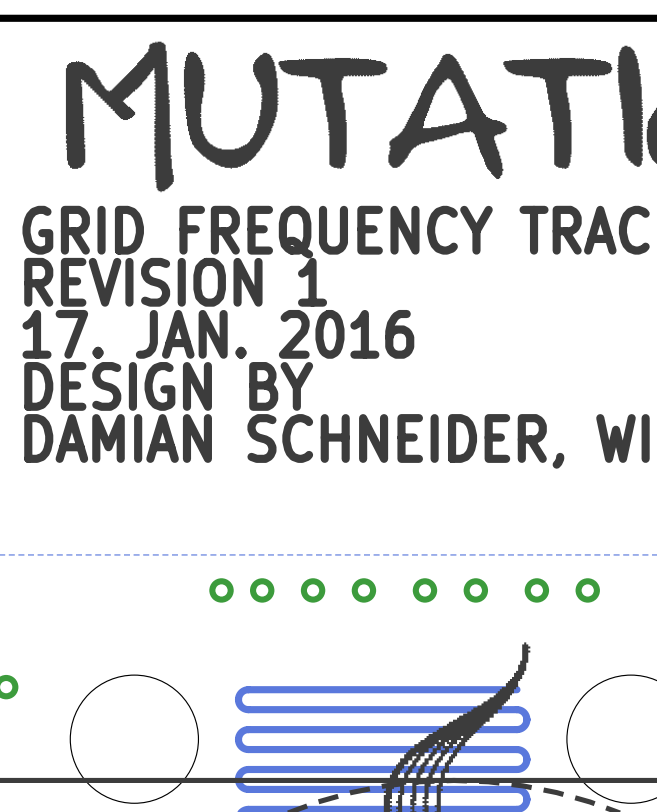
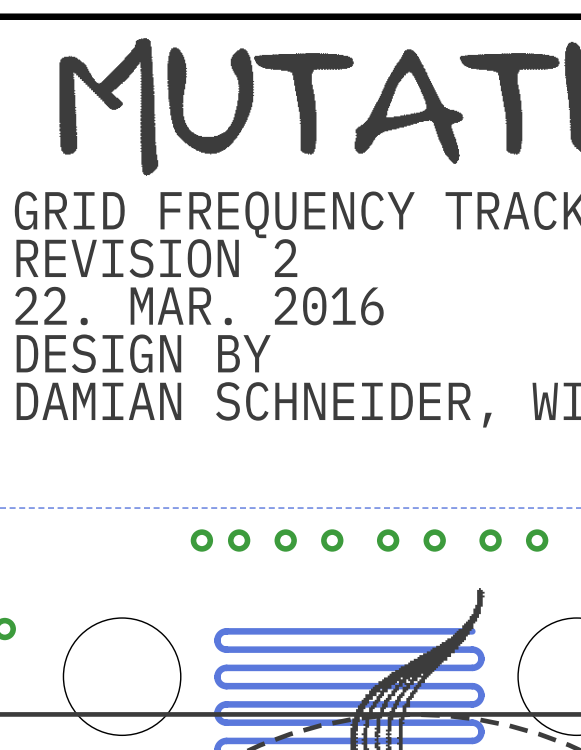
text: REVISION 1 (175, 282) -> REVISION 2 (156, 258)
text: 17. JAN. 2016 (218, 334) -> 22. MAR. 2016 (199, 306)

